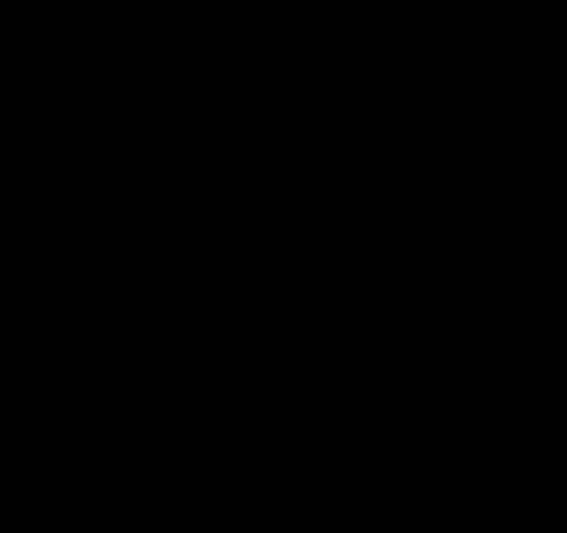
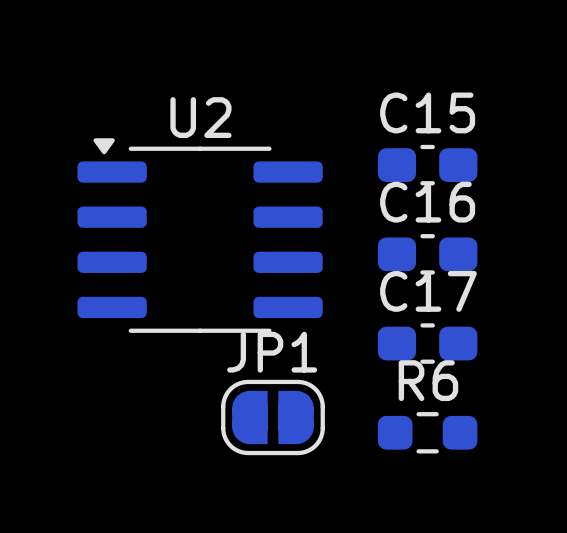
C15: none -> (427, 165)
U2: none -> (200, 235)
C16: none -> (427, 254)
C17: none -> (427, 343)
JP1: none -> (272, 417)
R6: none -> (427, 432)

